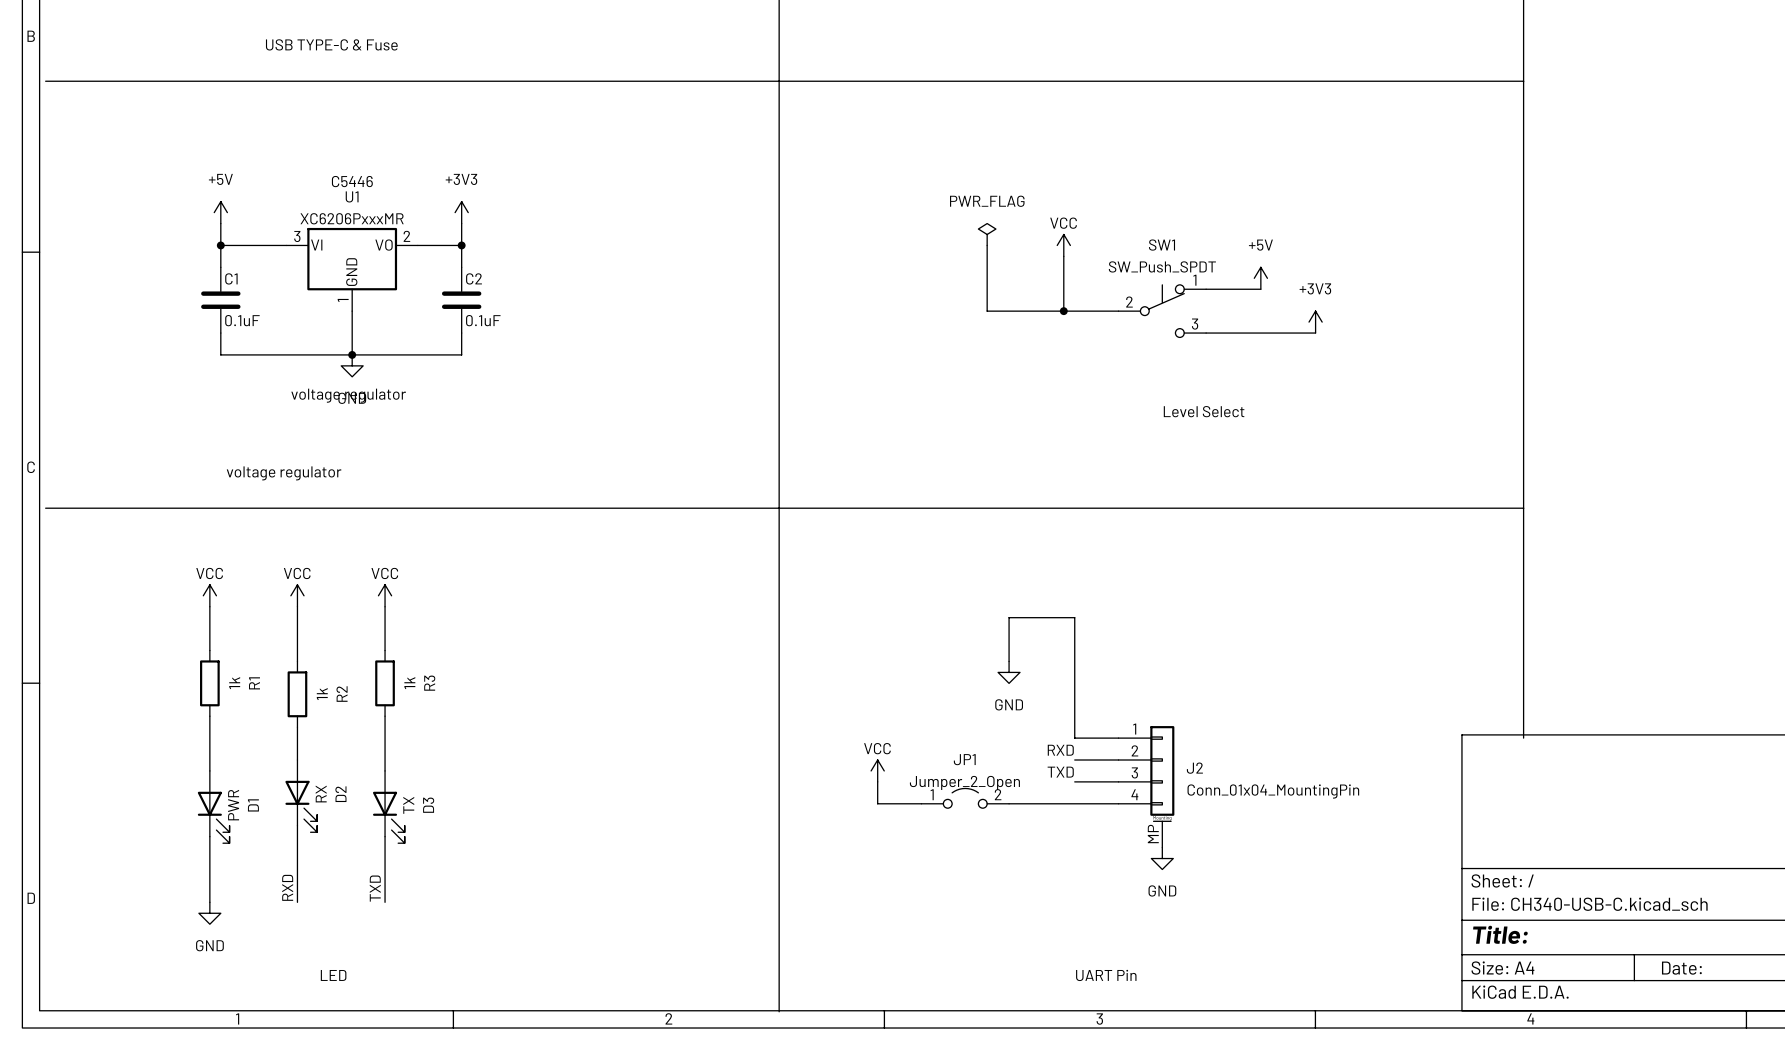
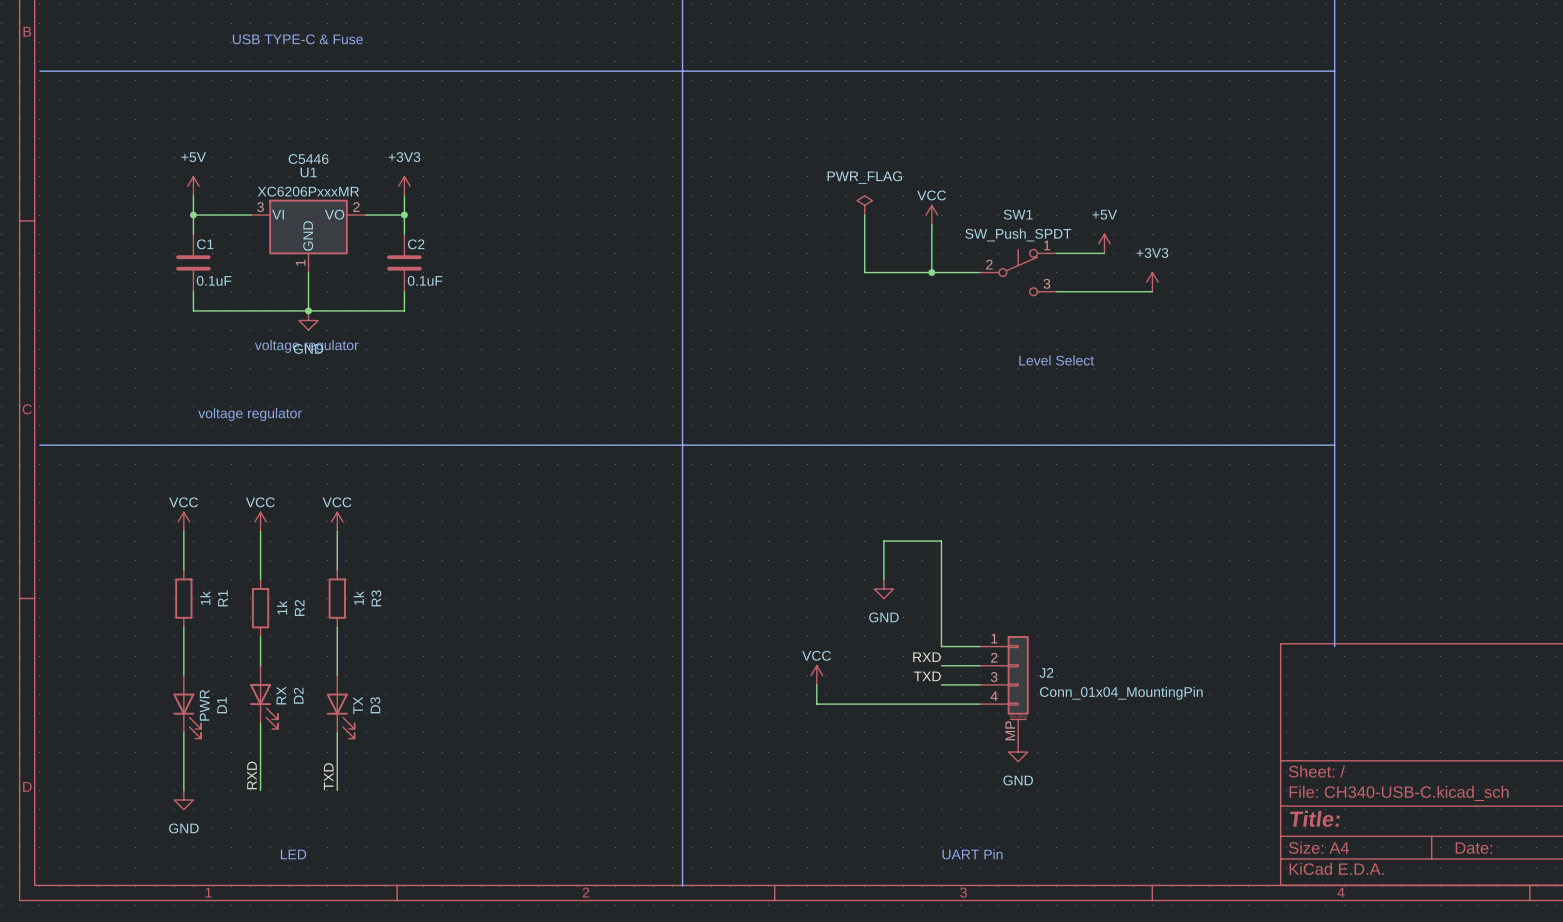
power symbol position: VCC (877, 770) -> VCC (816, 675)
wire: (877, 781) (877, 803) (921, 803) -> none
wire: none -> (816, 684) (816, 704) (883, 704)
JP1: Jumper_2_Open (965, 798) -> none

